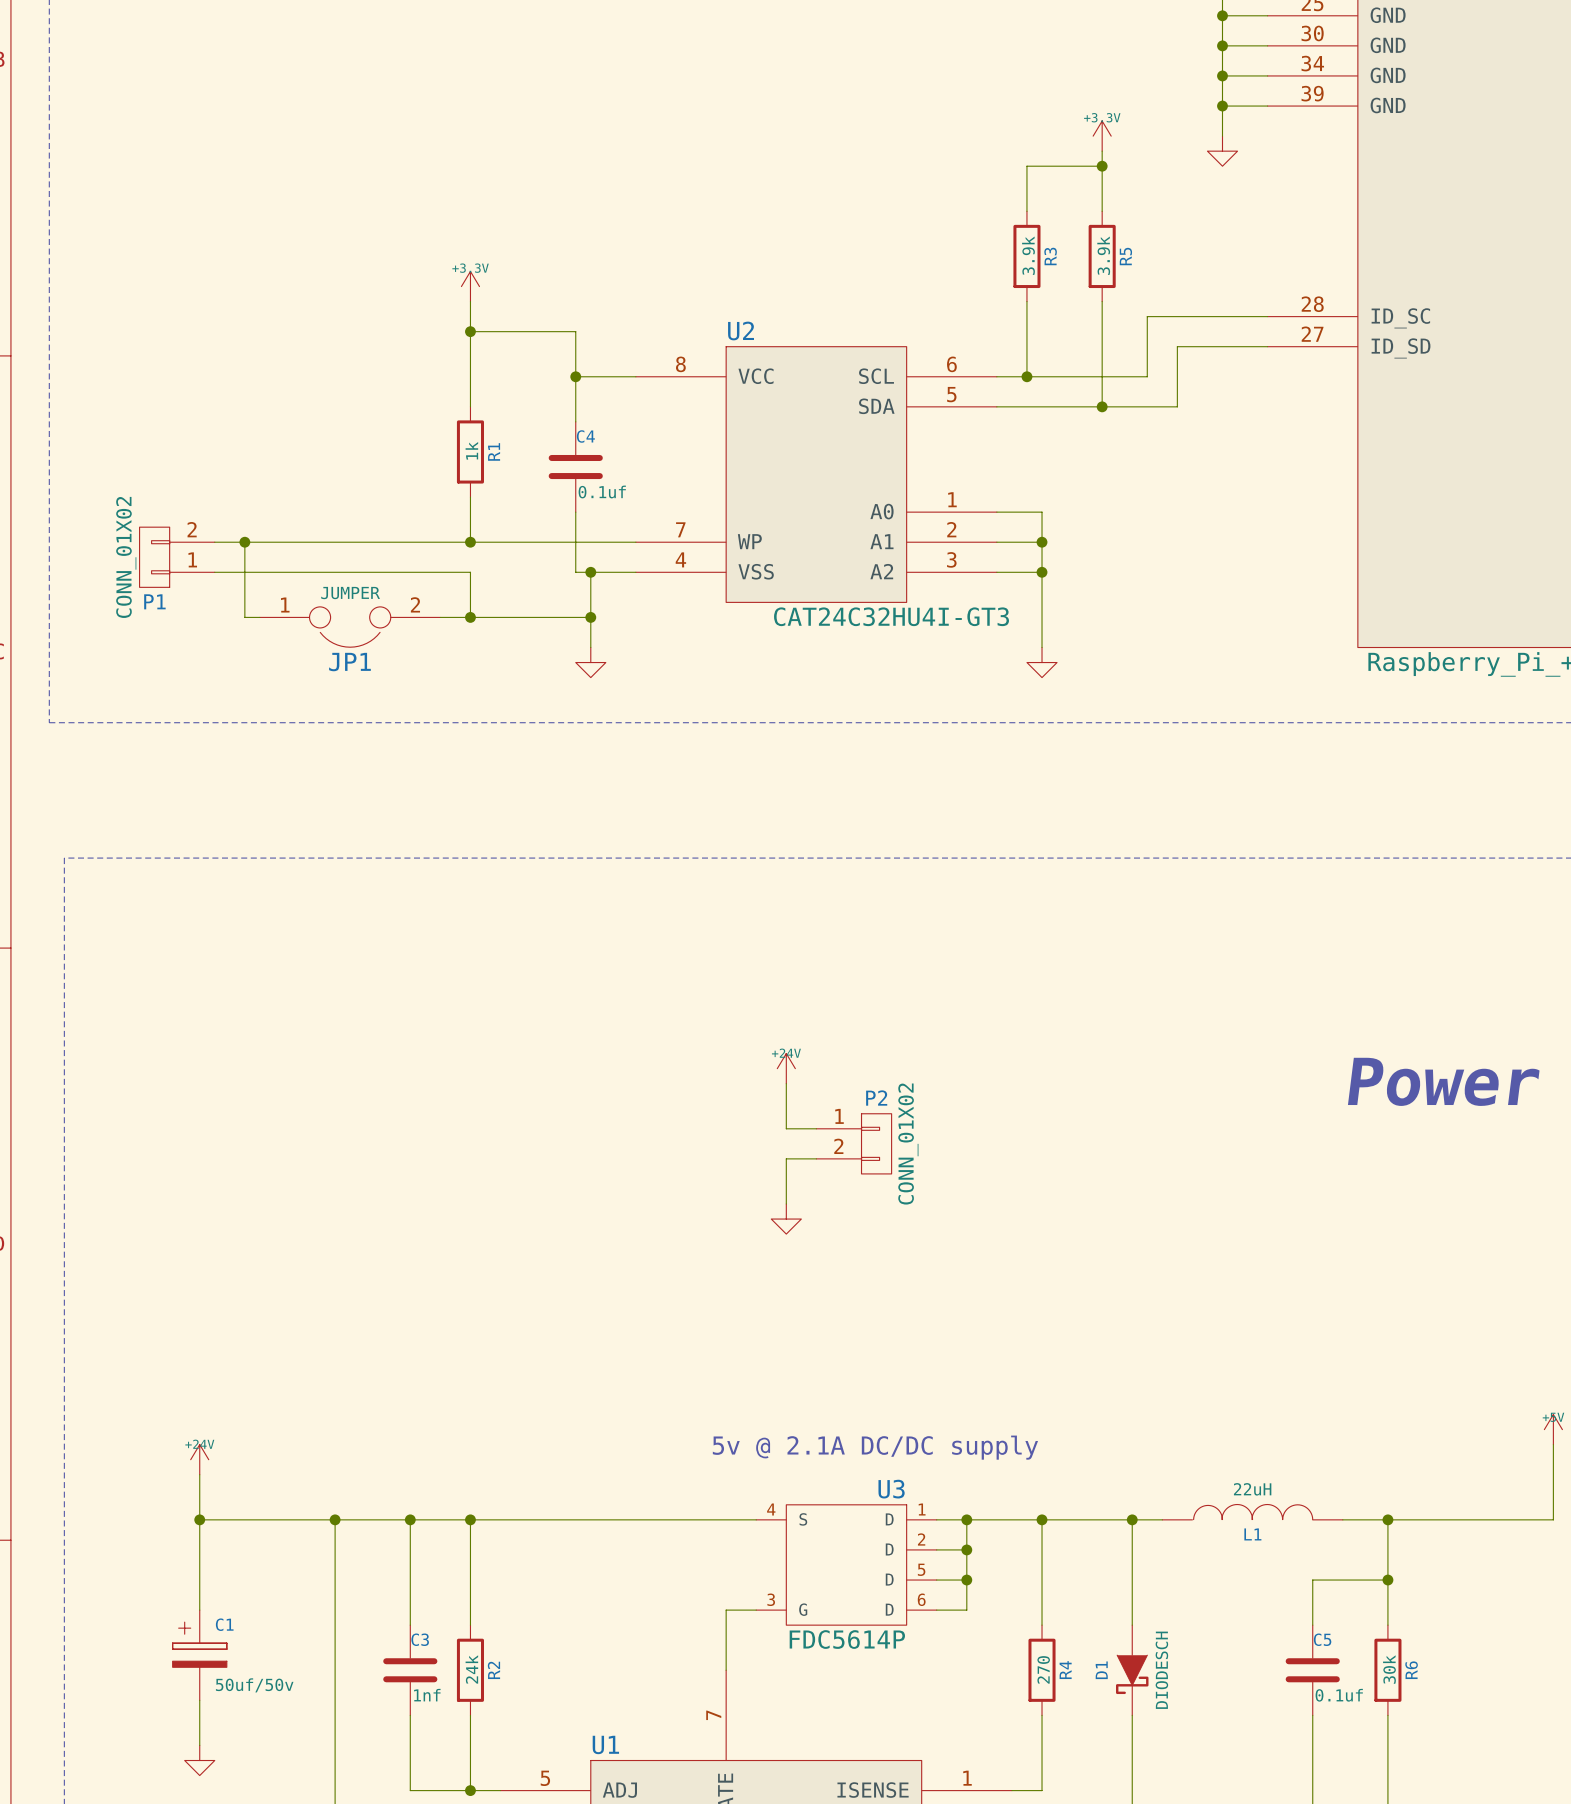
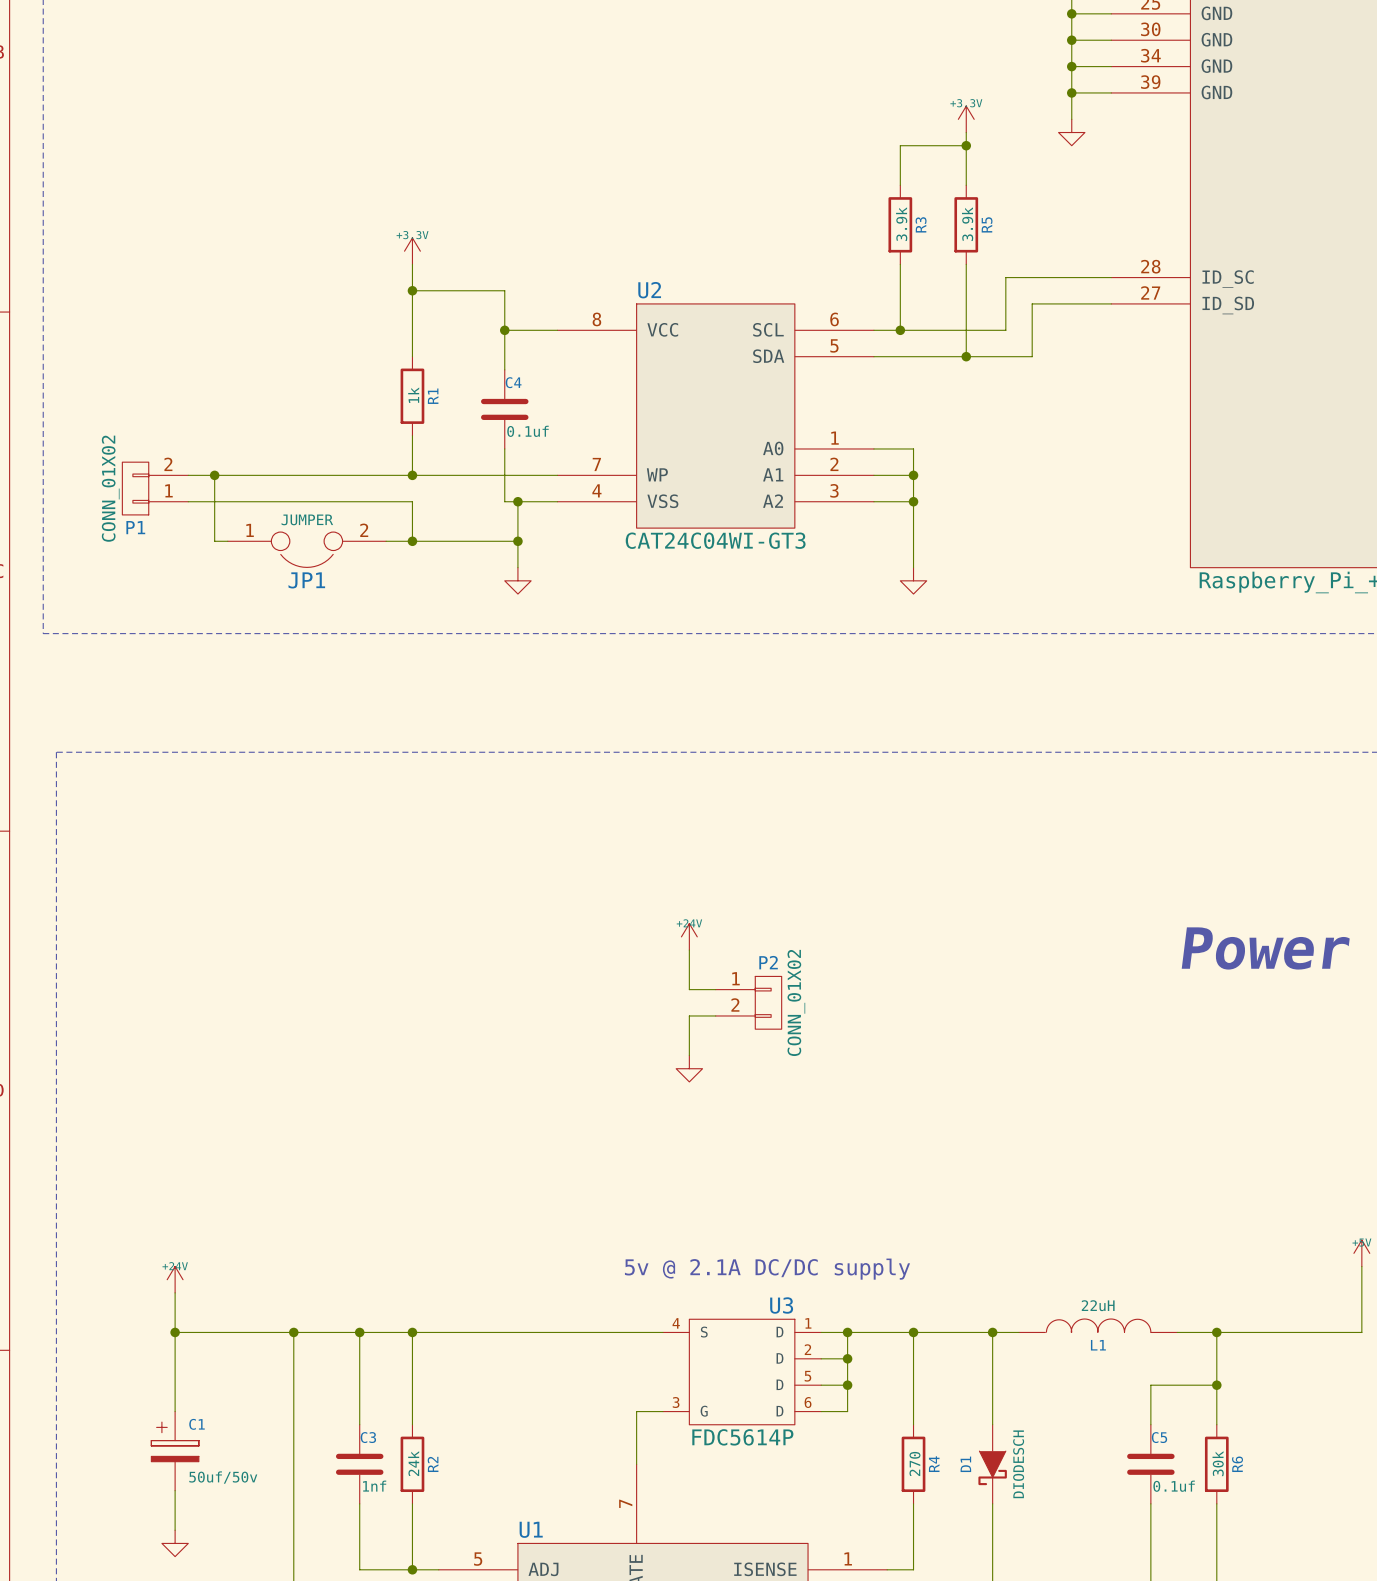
U2 value: CAT24C32HU4I-GT3 (891, 616) -> CAT24C04WI-GT3 (715, 540)

